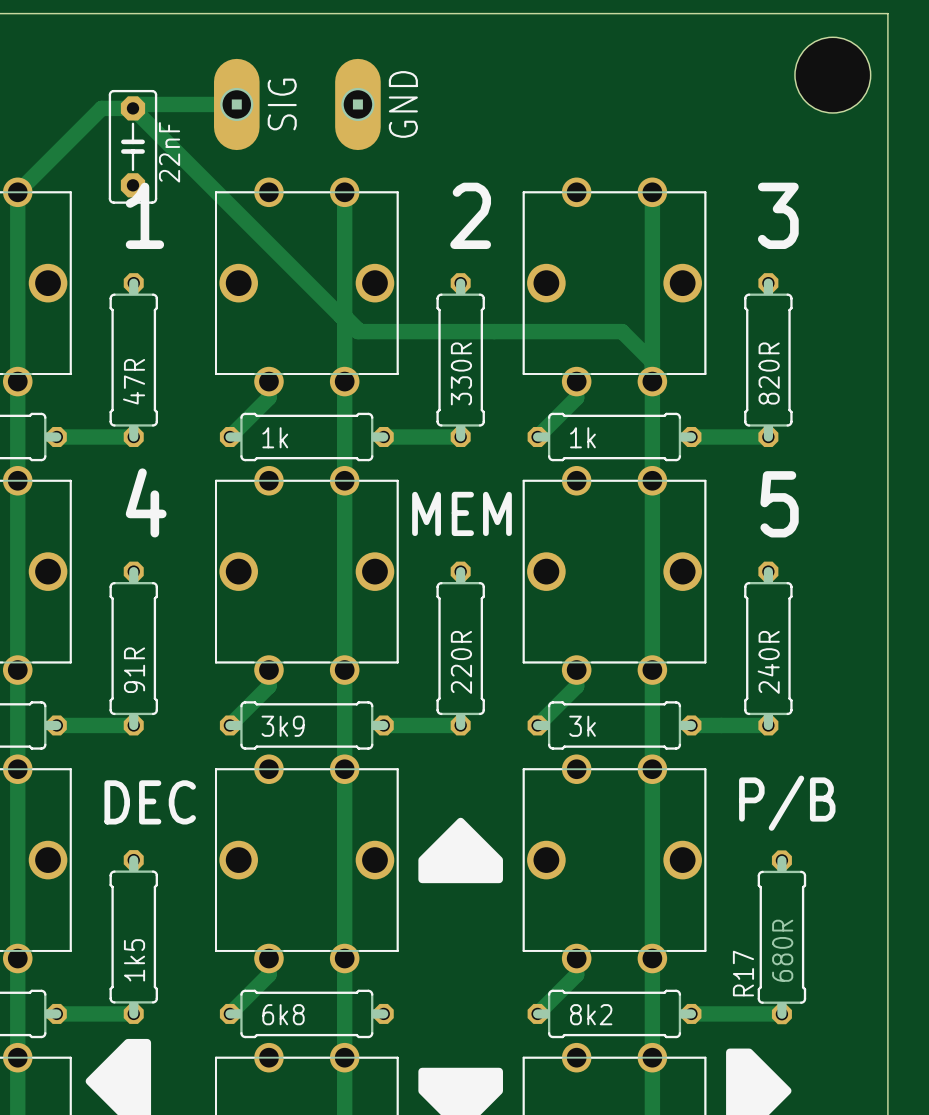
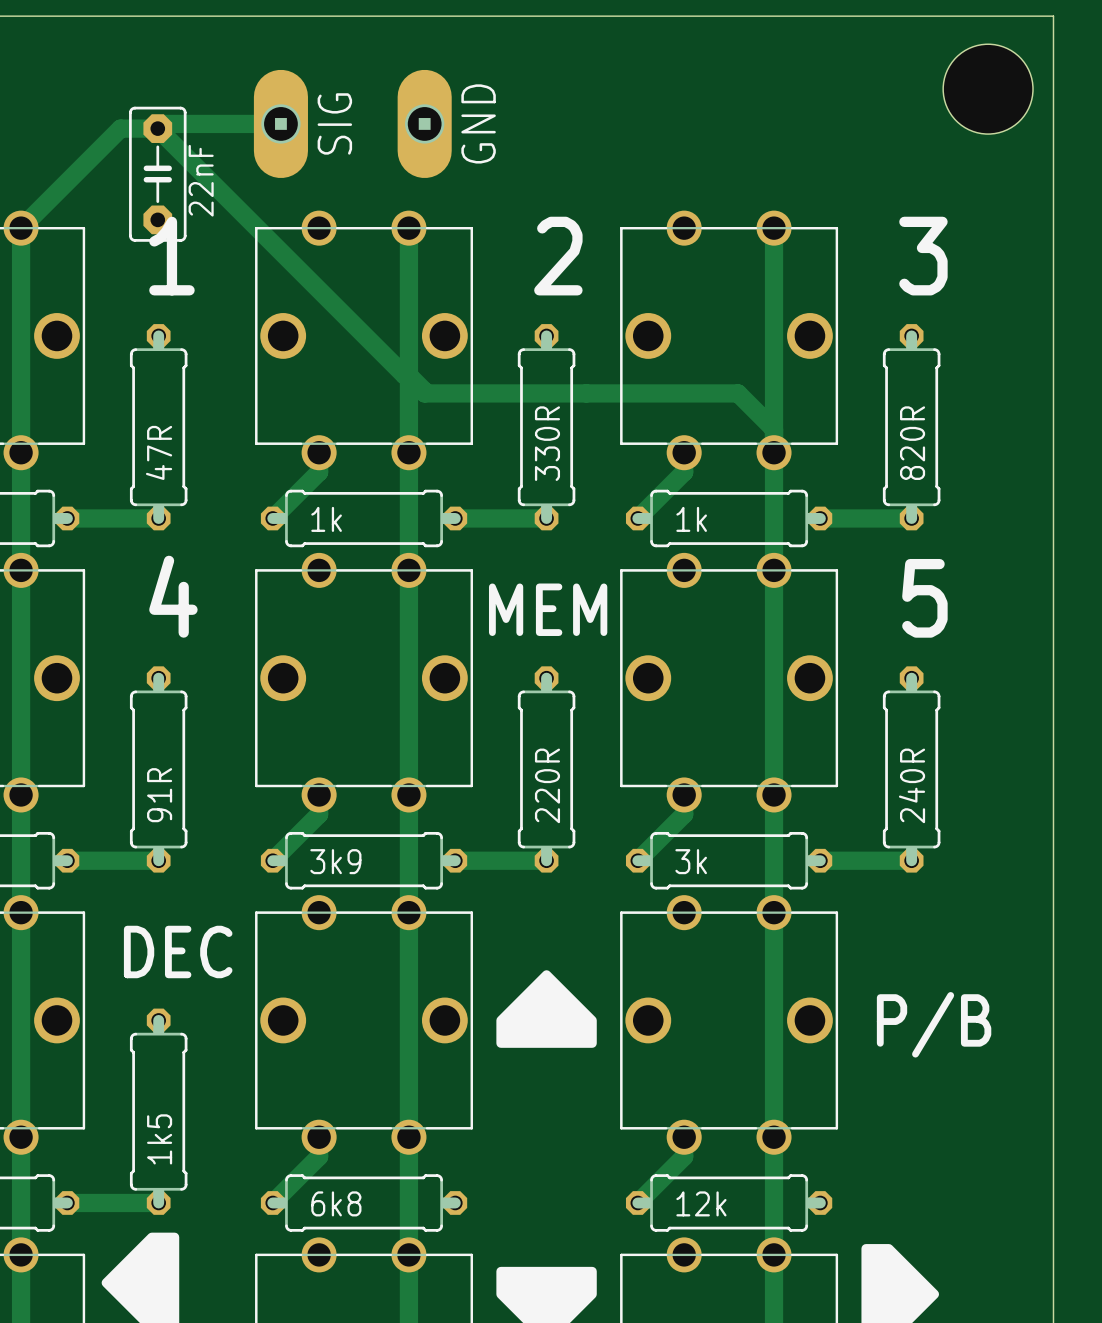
text position: P/B (787, 803) -> P/B (934, 1024)
R17: 680R (781, 937) -> none
track: (691, 1013) (781, 1014) -> none
part value: 8k2 (591, 1014) -> 12k (701, 1203)

